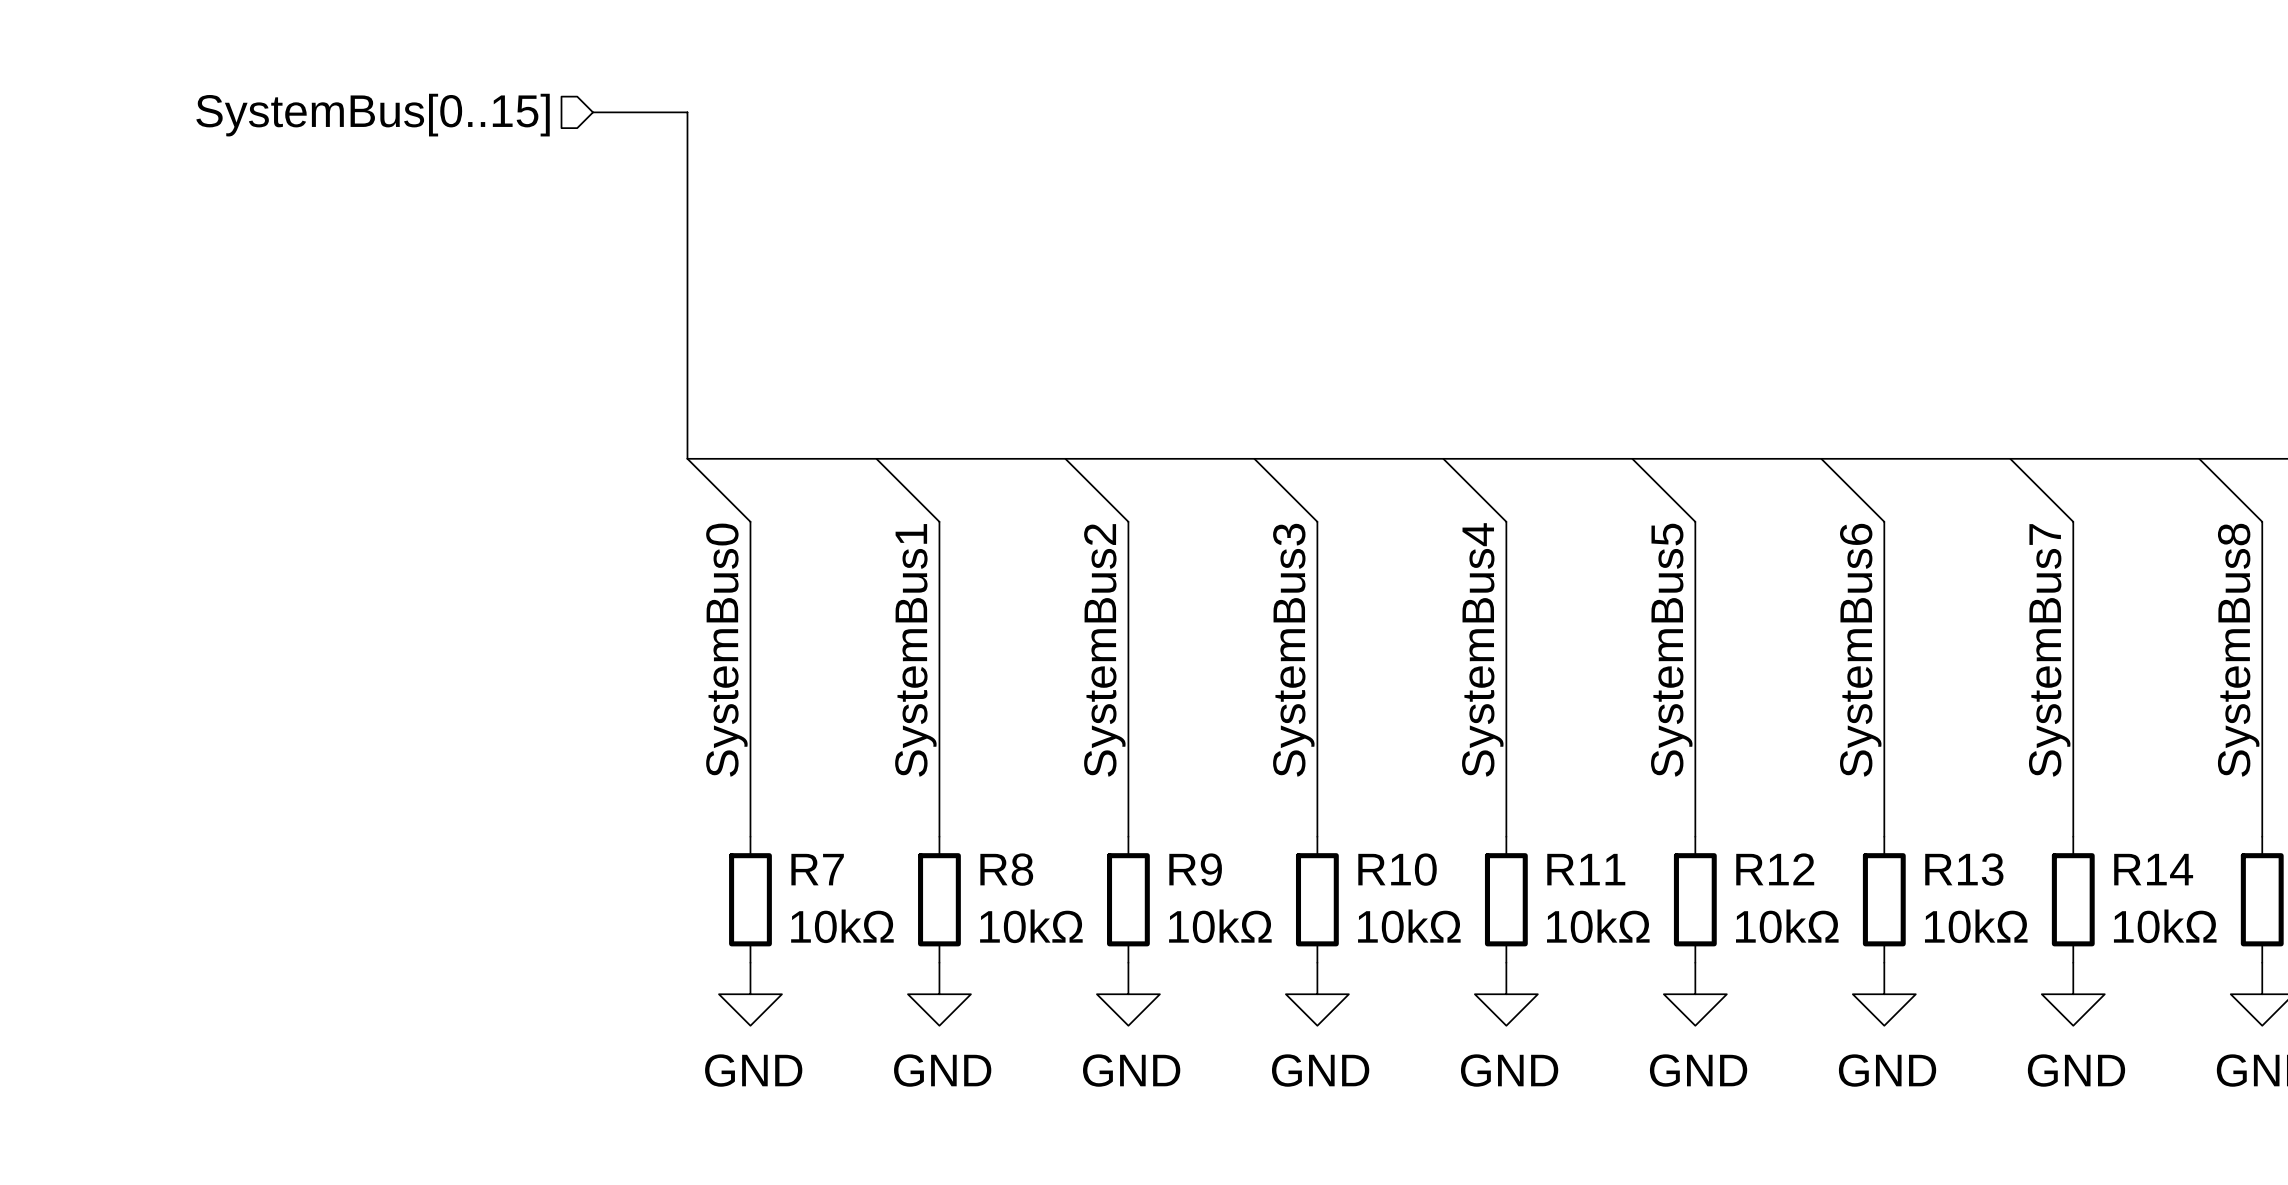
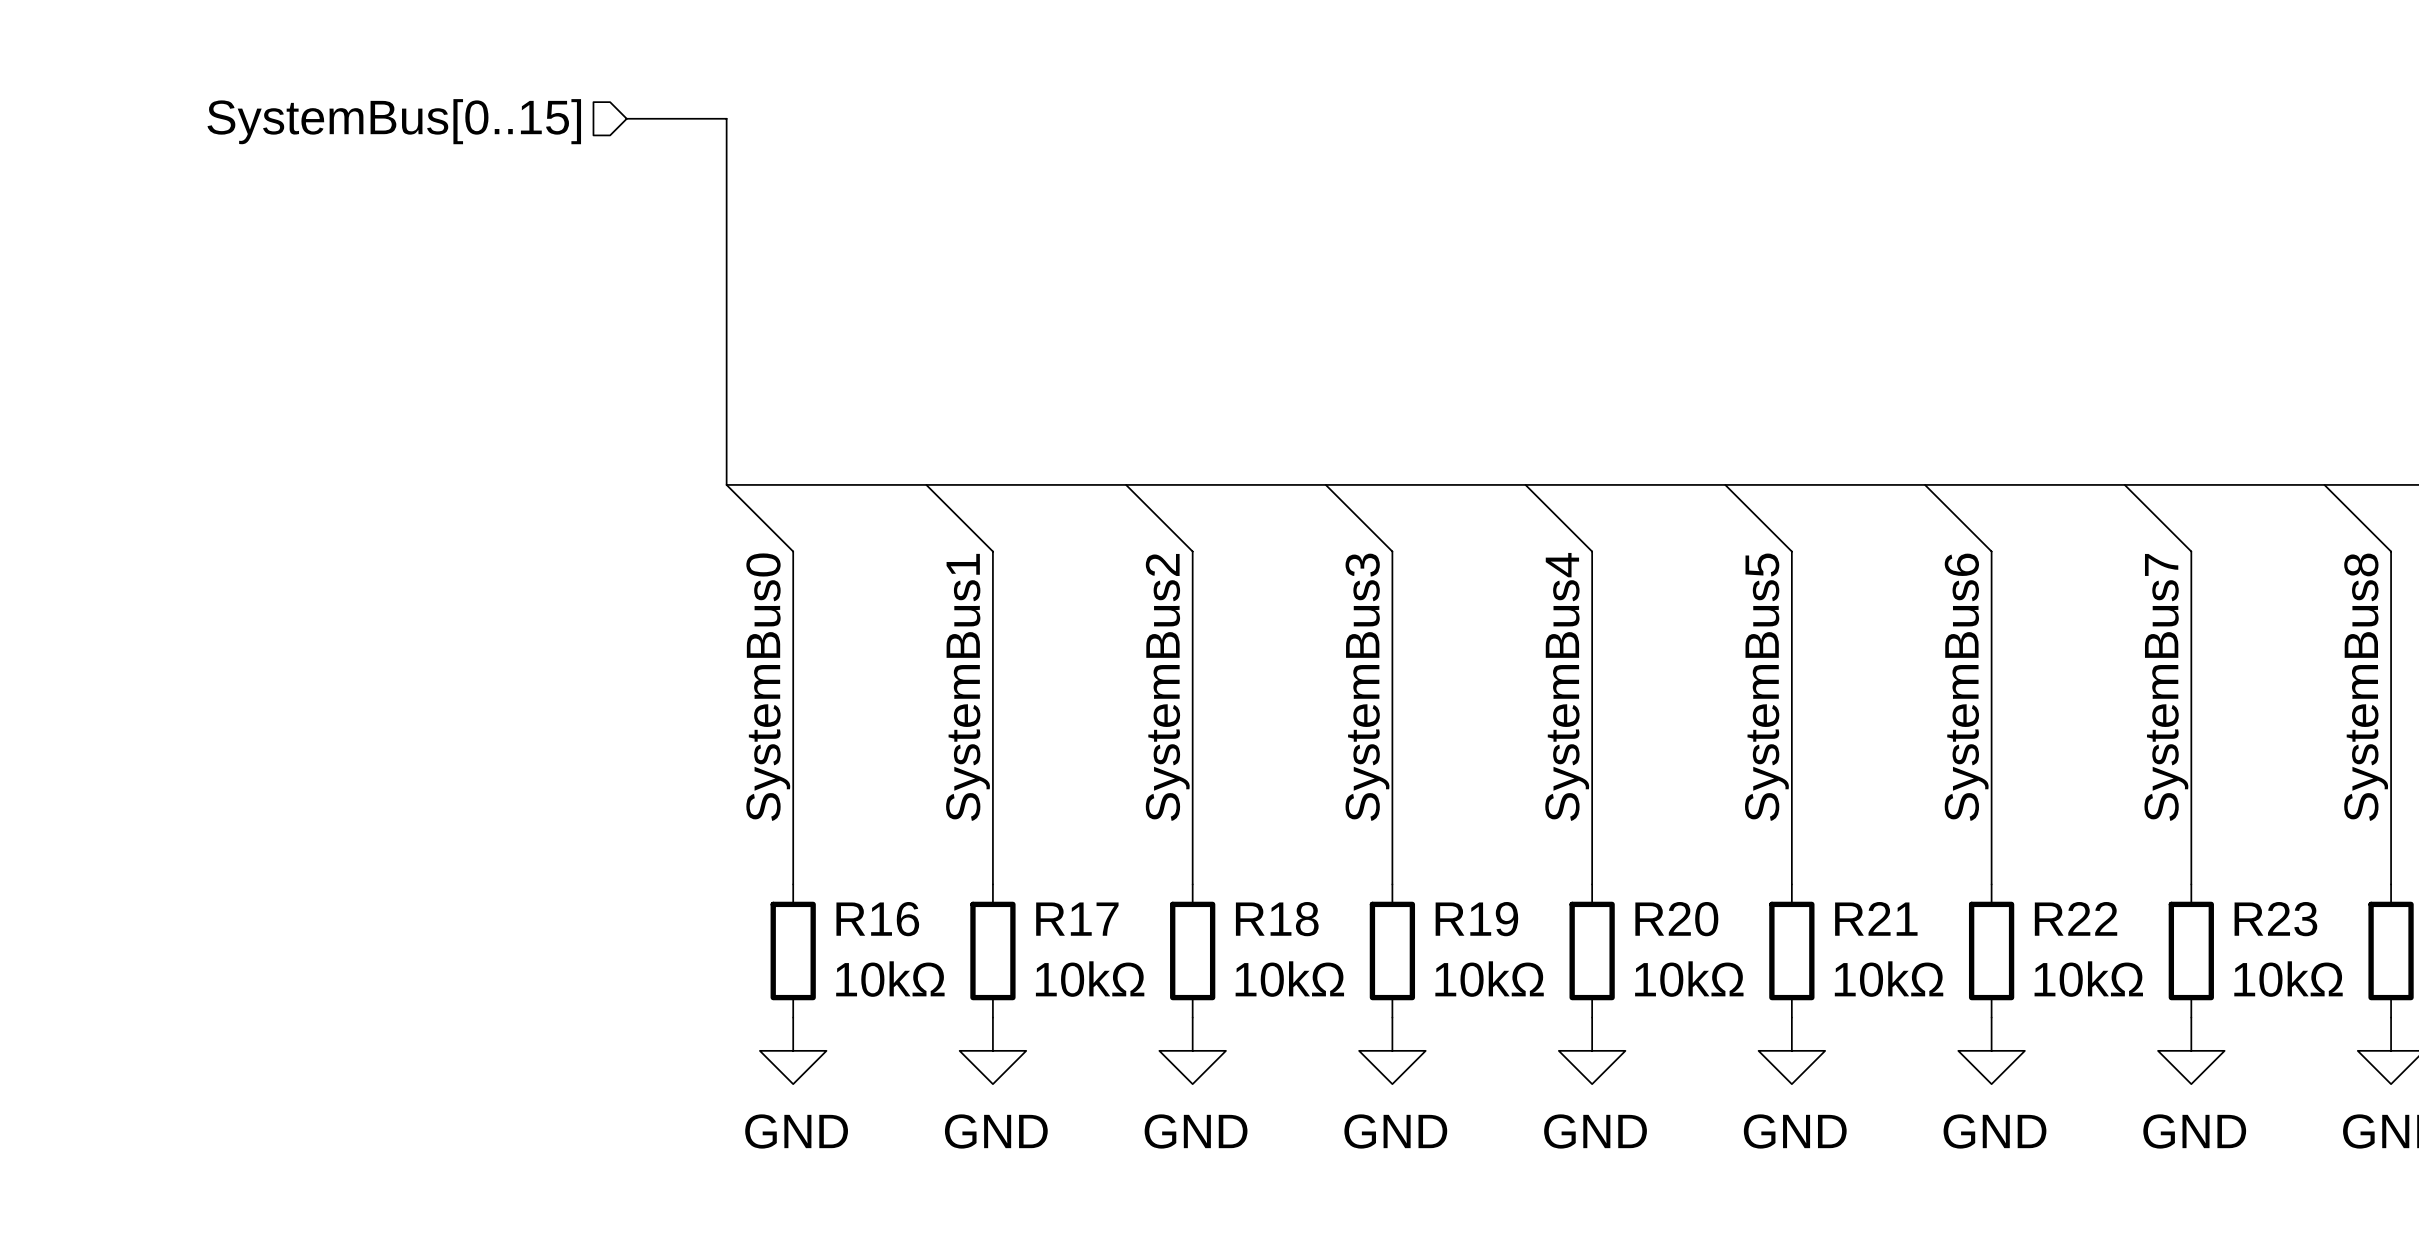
R7 name: R7 (817, 869) -> R16 (877, 919)
R8 name: R8 (1006, 869) -> R17 (1077, 919)
R9 name: R9 (1195, 869) -> R18 (1277, 919)
R10 name: R10 (1397, 869) -> R19 (1476, 919)
R11 name: R11 (1586, 869) -> R20 (1676, 919)
R12 name: R12 (1775, 869) -> R21 (1876, 918)
R13 name: R13 (1964, 869) -> R22 (2076, 918)
R14 name: R14 (2153, 869) -> R23 (2275, 919)

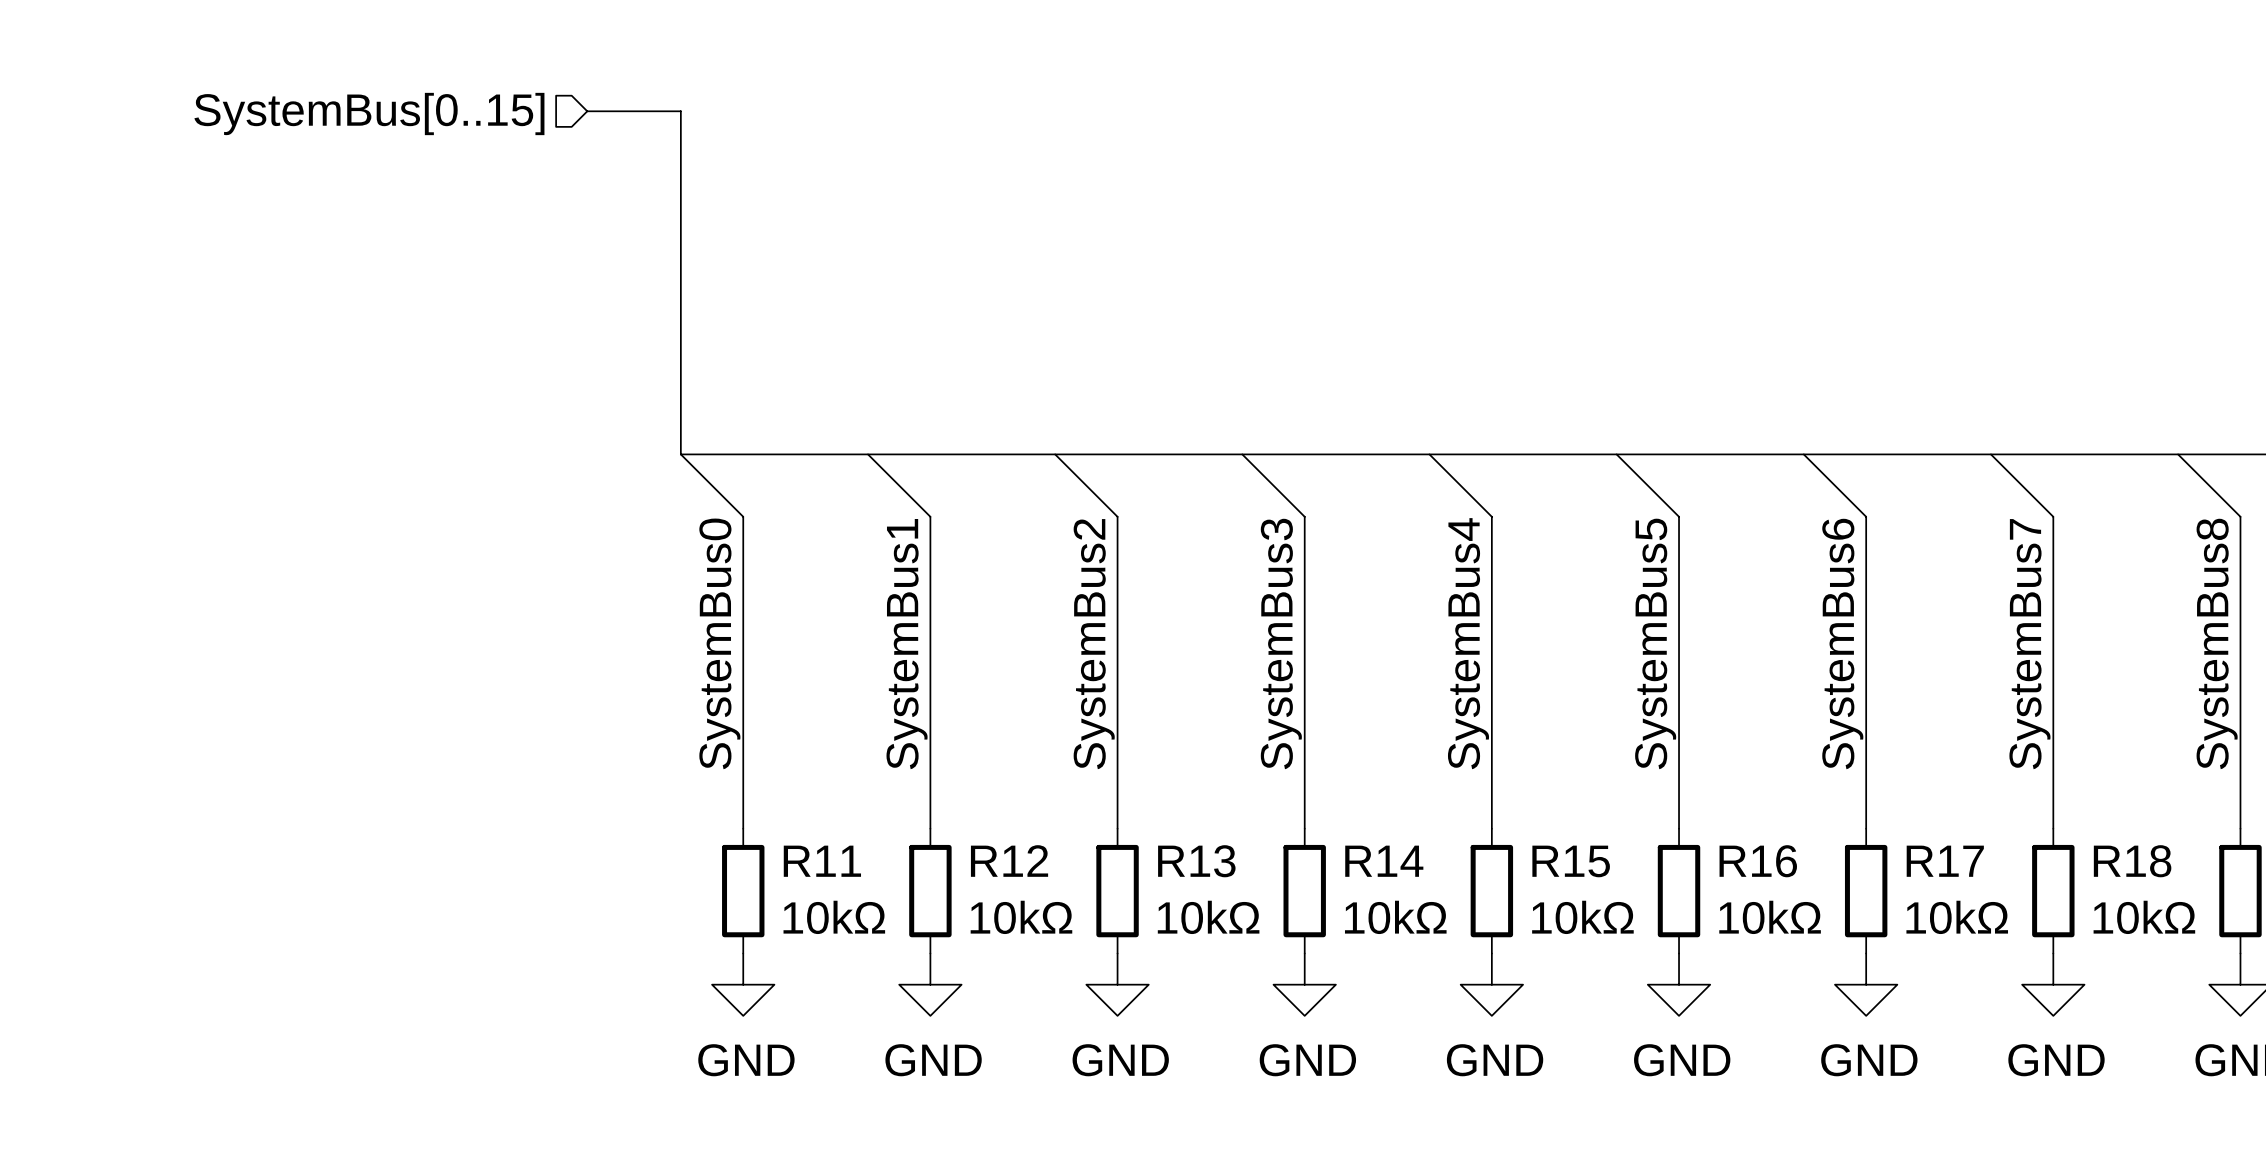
R21 name: R21 (1876, 918) -> R16 (1758, 861)
R22 name: R22 (2076, 918) -> R17 (1945, 861)
R16 name: R16 (877, 919) -> R11 (822, 861)
R17 name: R17 (1077, 919) -> R12 (1009, 861)
R18 name: R18 (1277, 919) -> R13 (1196, 861)
R19 name: R19 (1476, 919) -> R14 (1384, 861)
R20 name: R20 (1676, 919) -> R15 (1571, 861)
R23 name: R23 (2275, 919) -> R18 (2132, 861)

